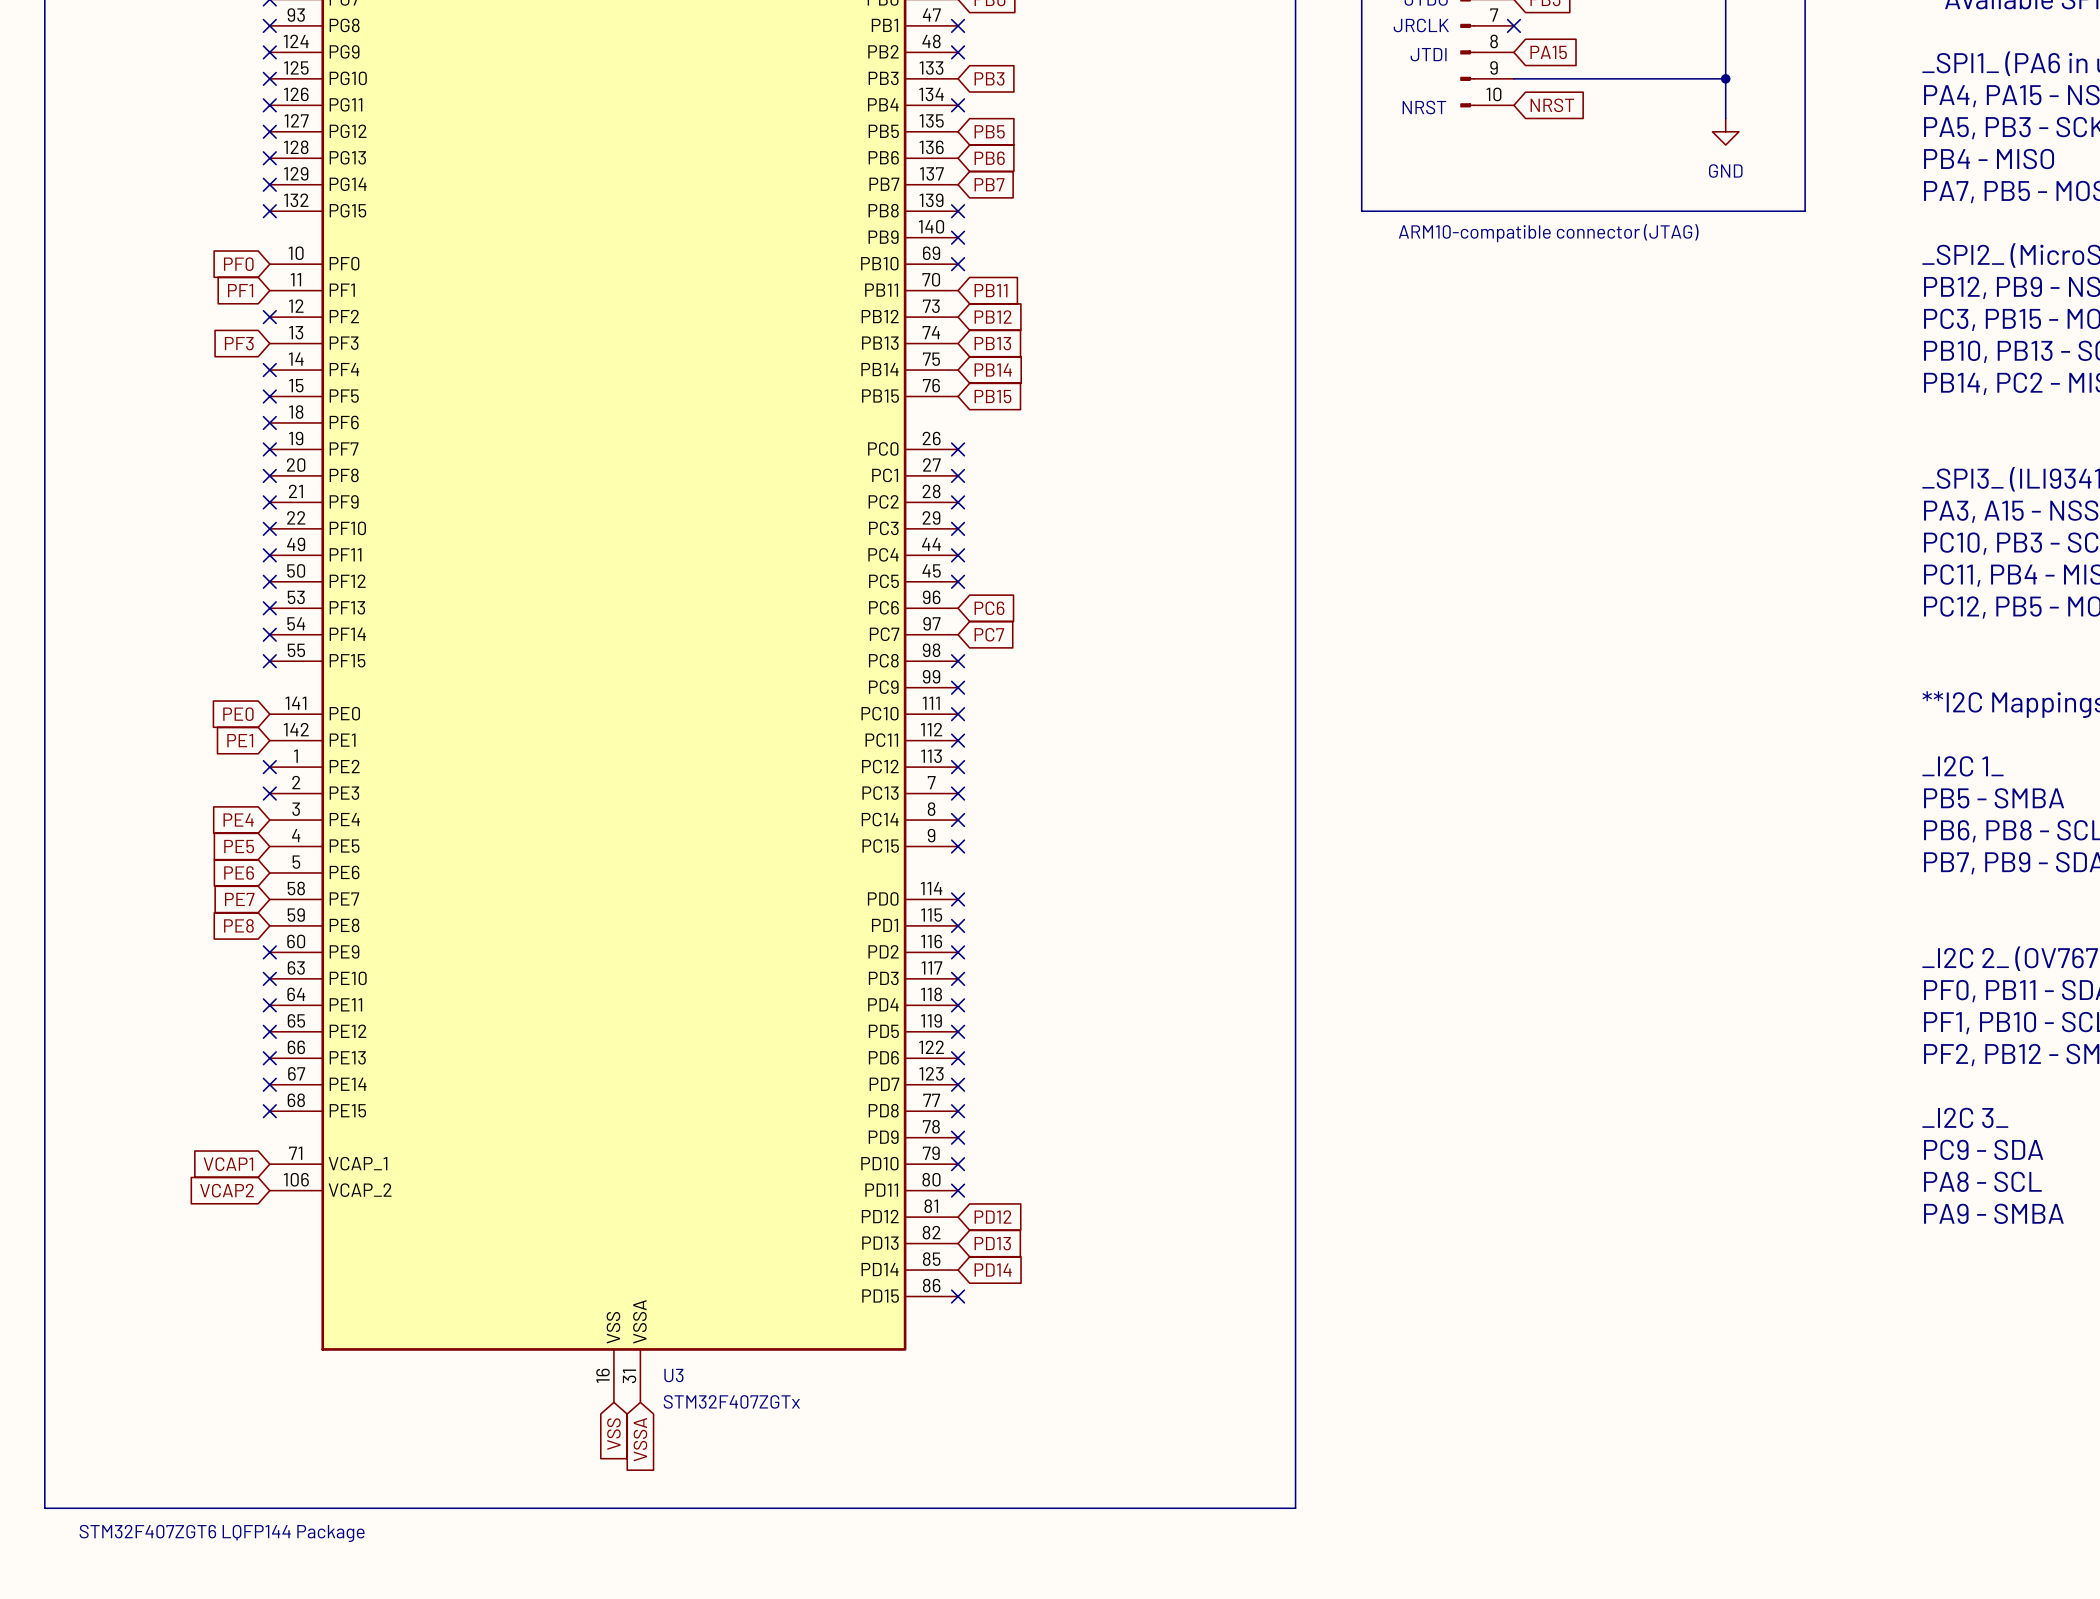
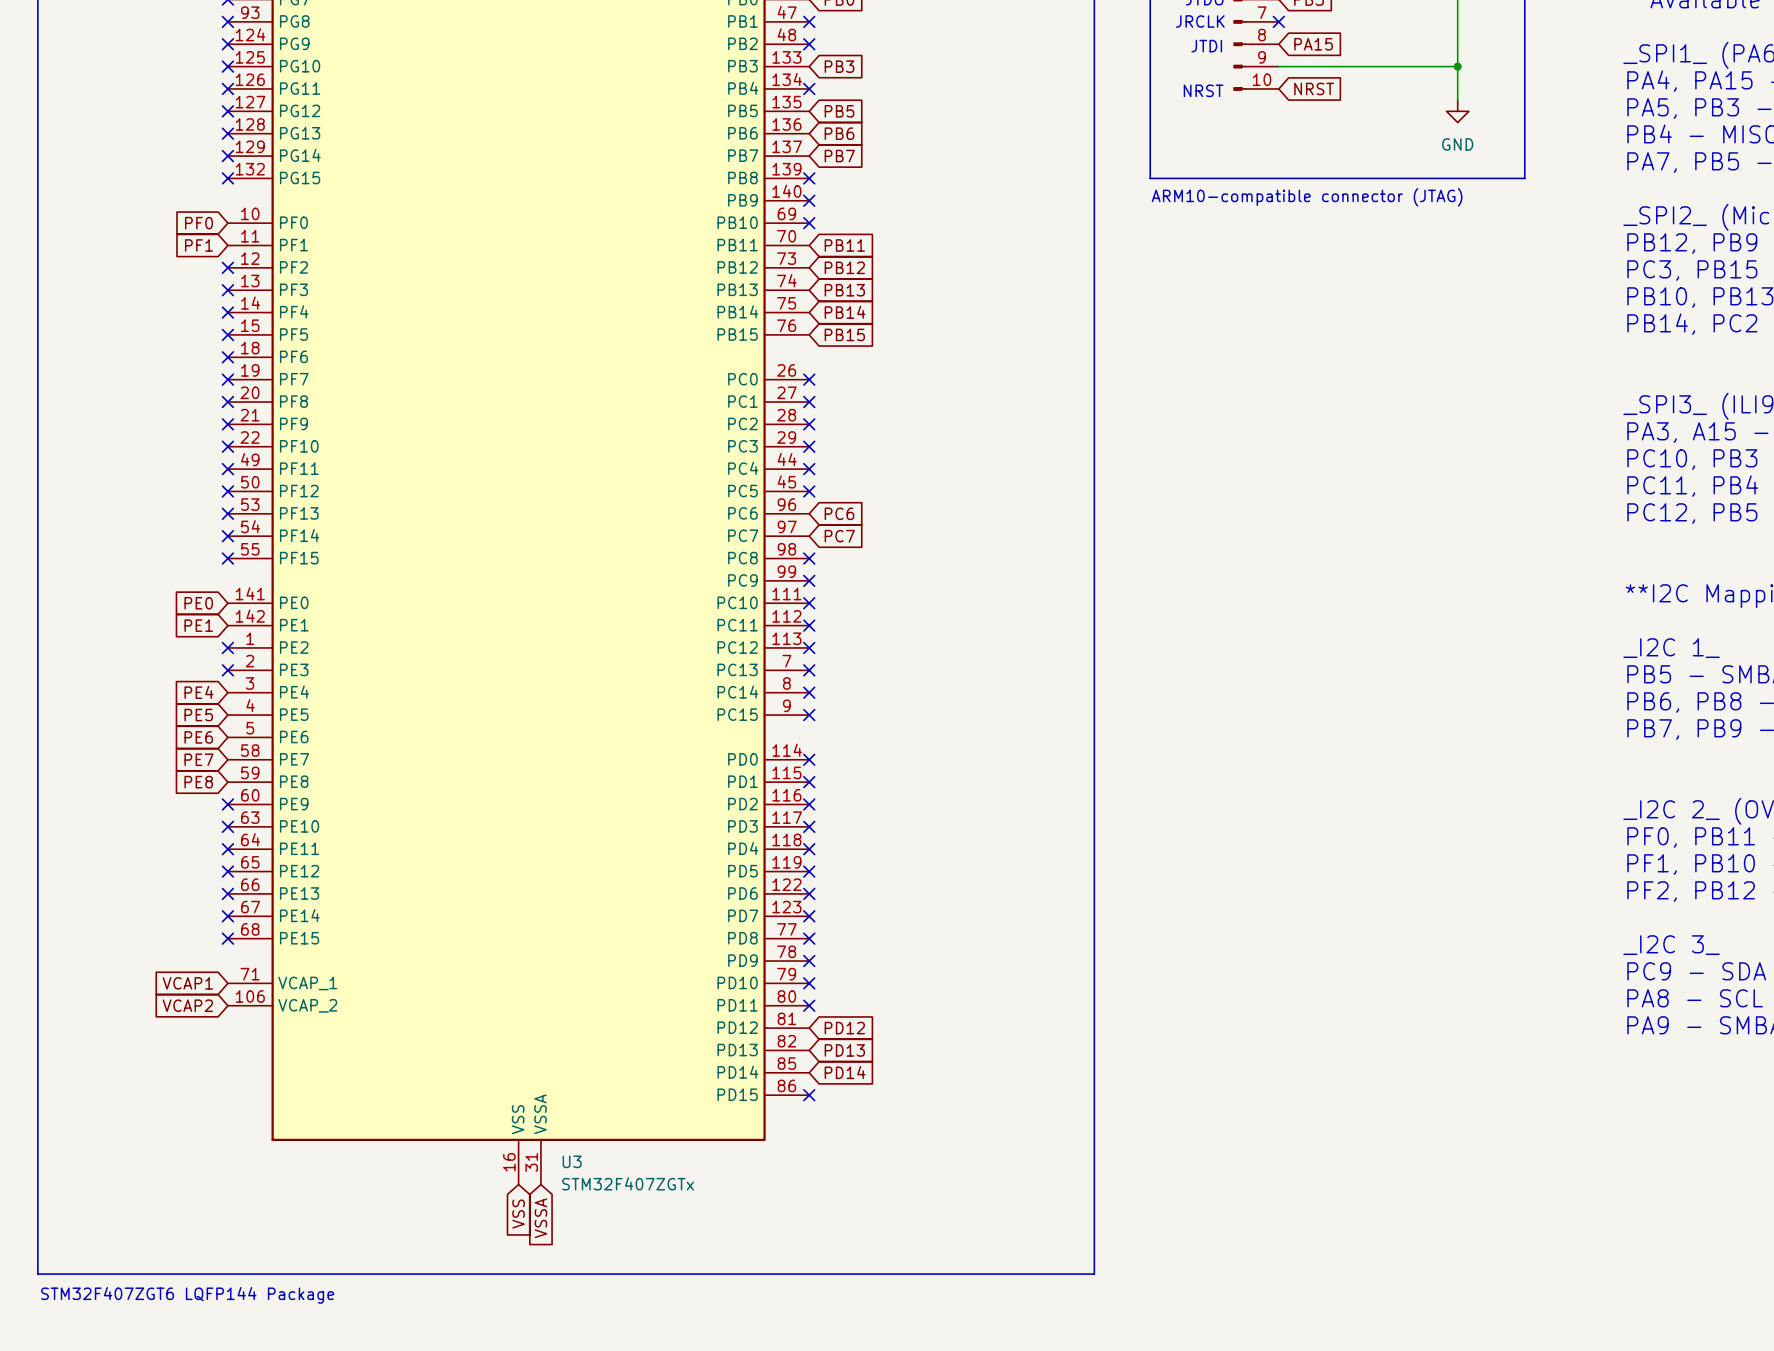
global label: PF3 (239, 343) -> none
no-connect mark: none -> (227, 290)

